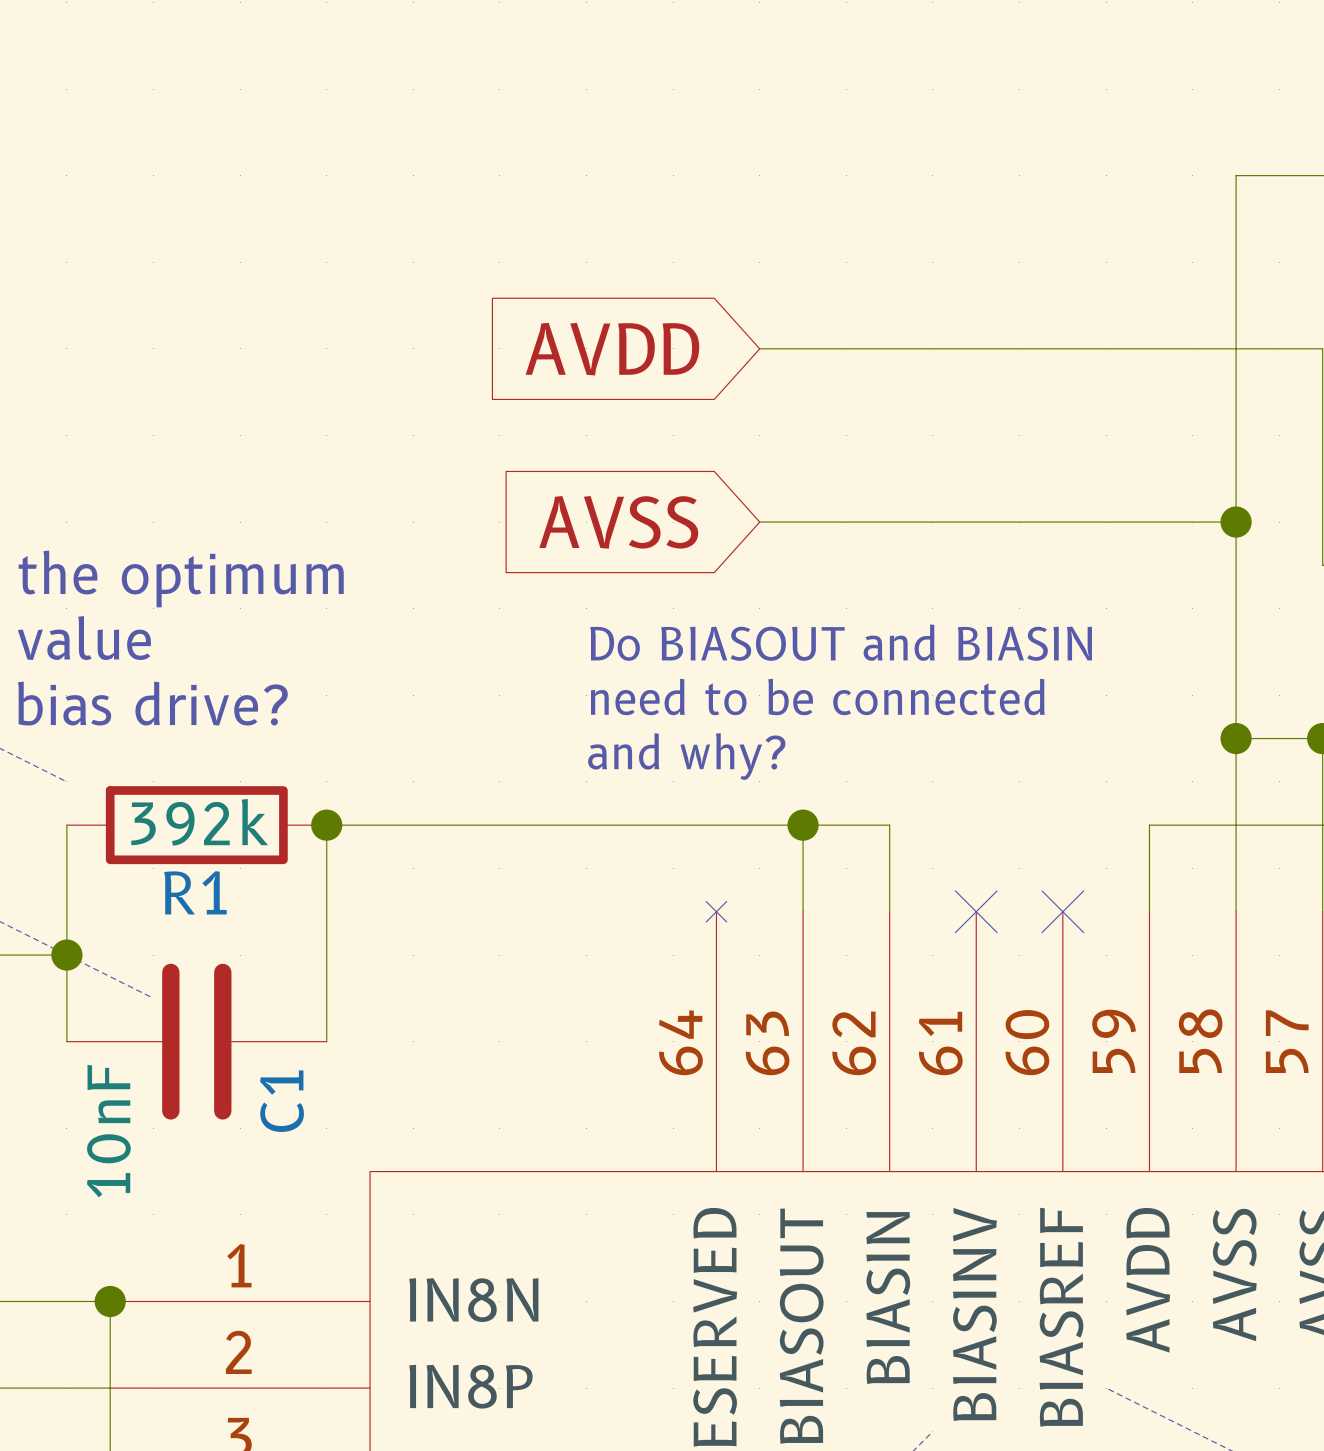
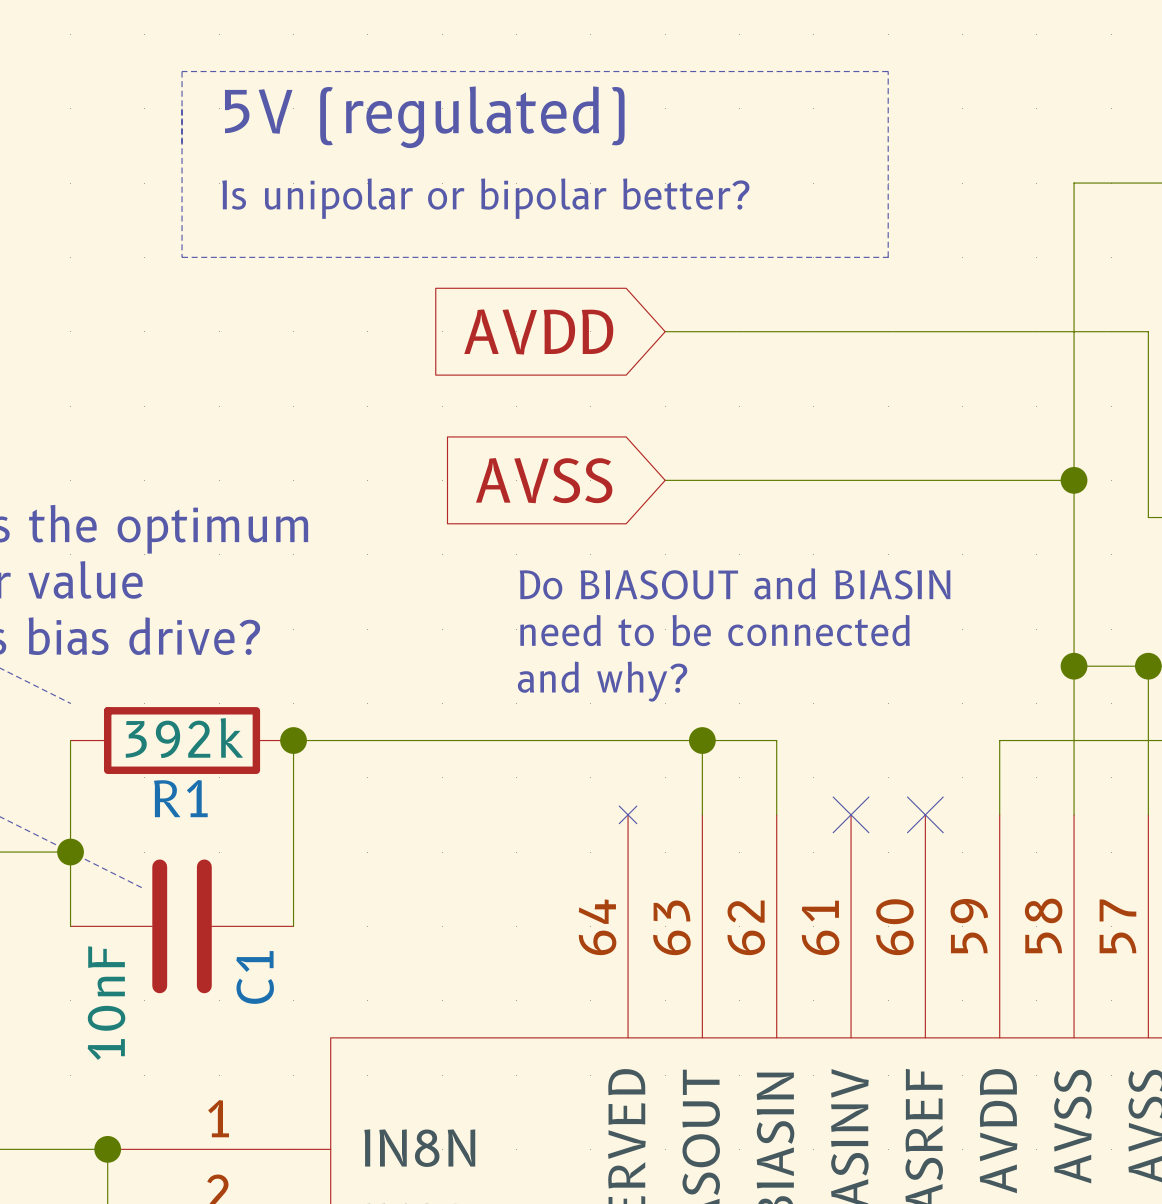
line: none -> (182, 71) (182, 257) (888, 257) (888, 71) (182, 71)
text: none -> 5V (regulated) (424, 117)
text: none -> Is unipolar or bipolar better? (485, 198)

